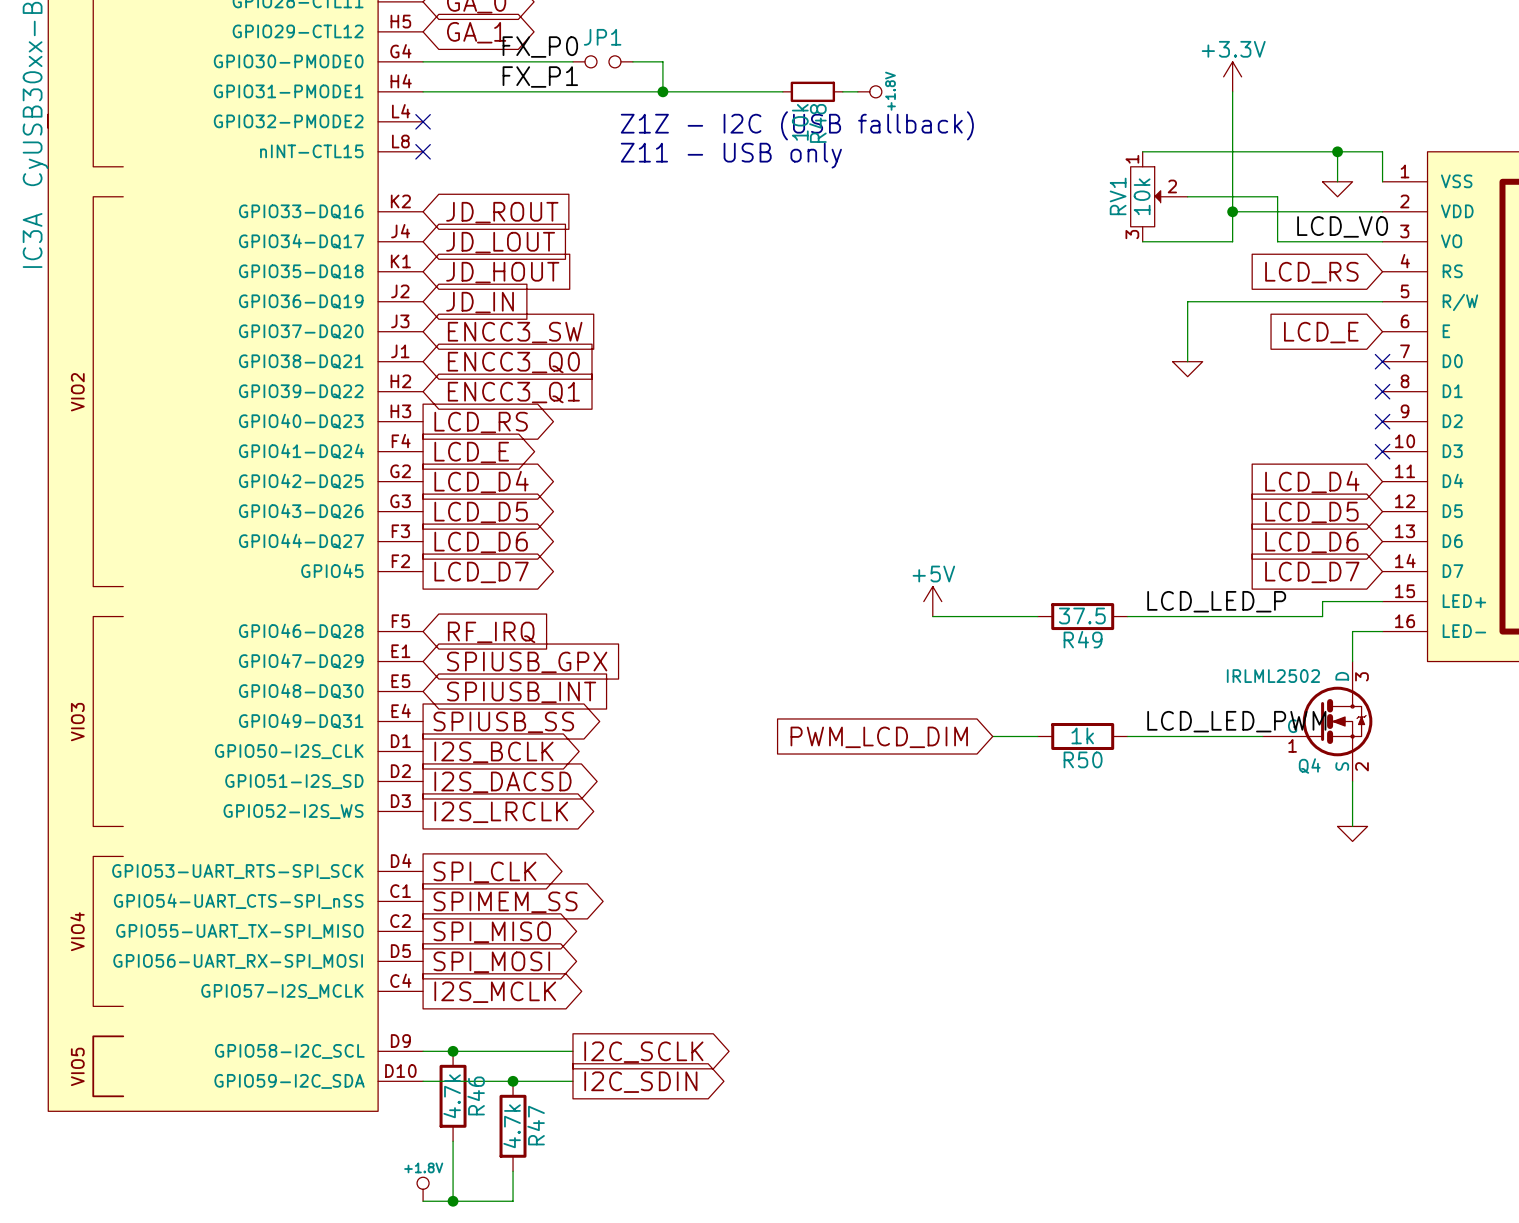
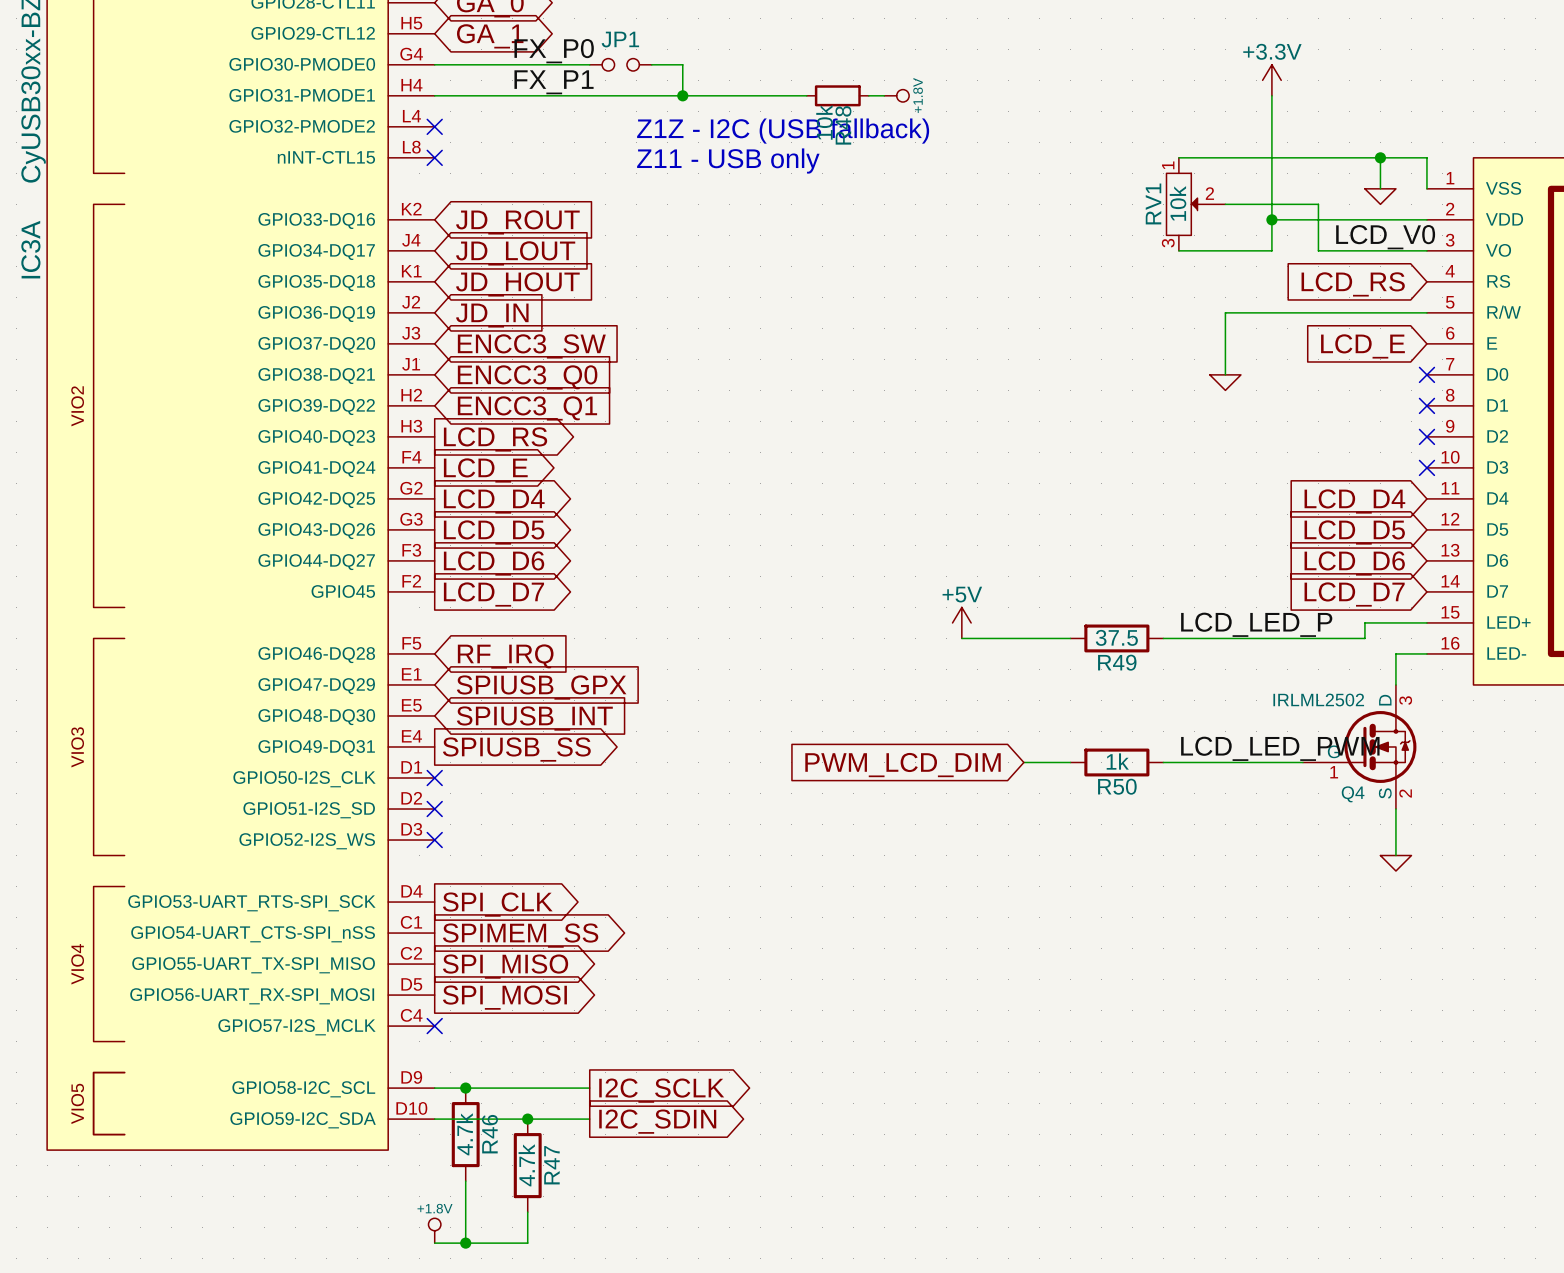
no-connect mark: none -> (434, 778)
global label: I2S_BCLK (493, 752) -> none
no-connect mark: none -> (434, 809)
global label: I2S_DACSD (502, 782) -> none
no-connect mark: none -> (434, 840)
global label: I2S_LRCLK (501, 812) -> none
no-connect mark: none -> (434, 1026)
global label: I2S_MCLK (495, 992) -> none

